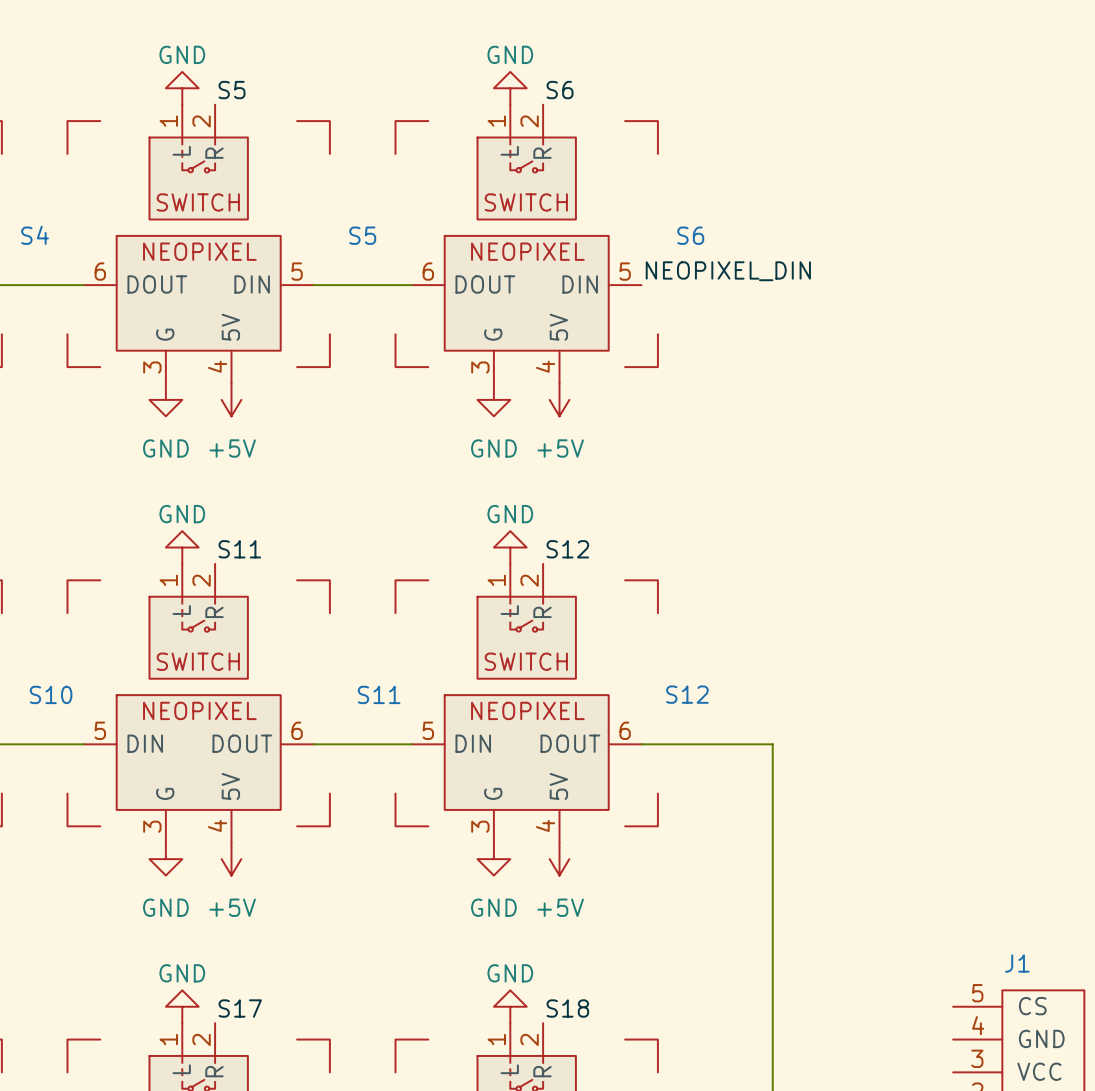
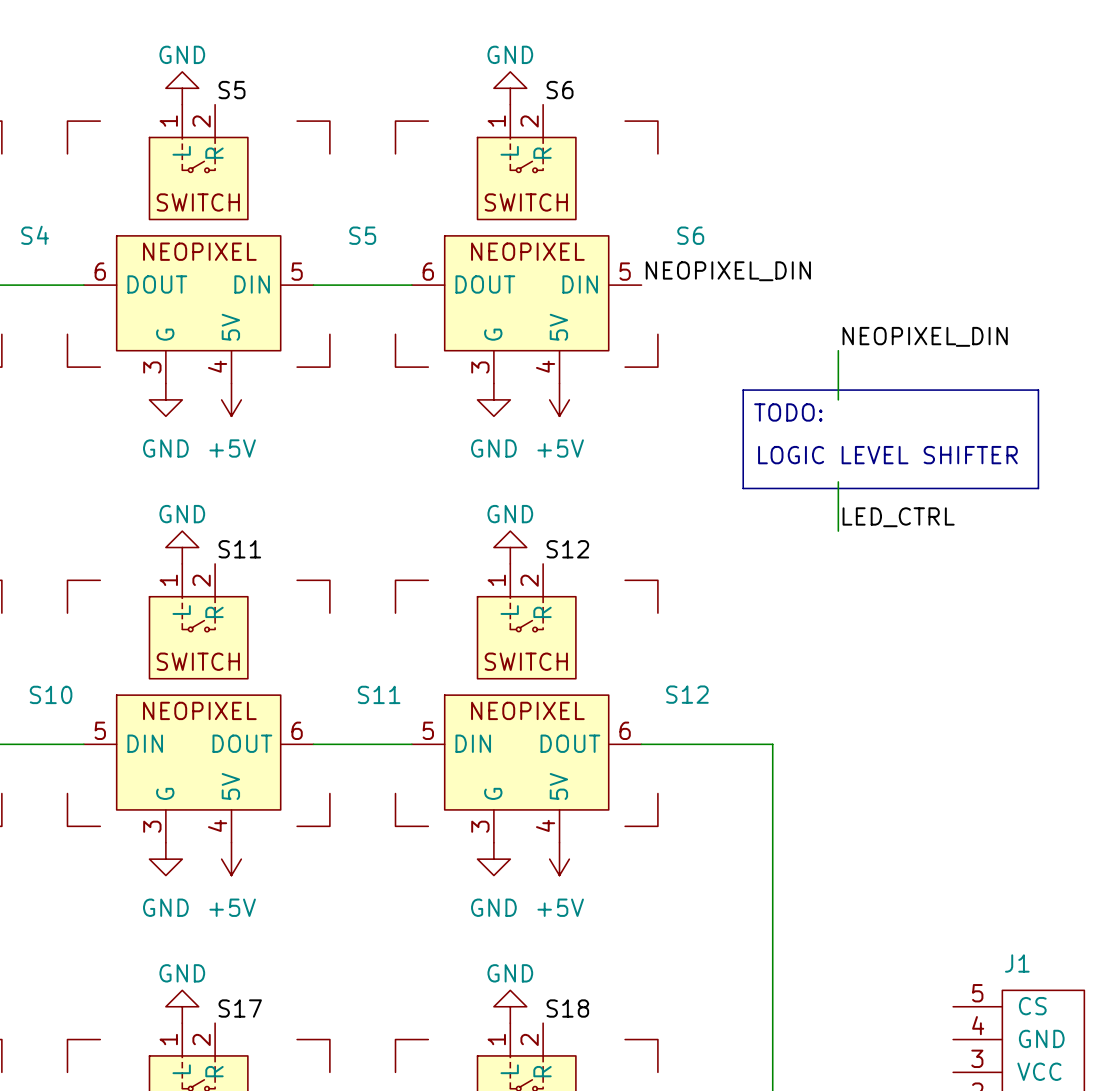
label: none -> NEOPIXEL_DIN (925, 336)
wire: none -> (838, 350) (838, 399)
line: none -> (743, 390) (1038, 390) (1038, 488) (743, 488) (743, 390)
text: none -> TODO: (788, 412)
text: none -> LOGIC LEVEL SHIFTER (887, 455)
wire: none -> (838, 481) (838, 531)
label: none -> LED_CTRL (898, 517)

